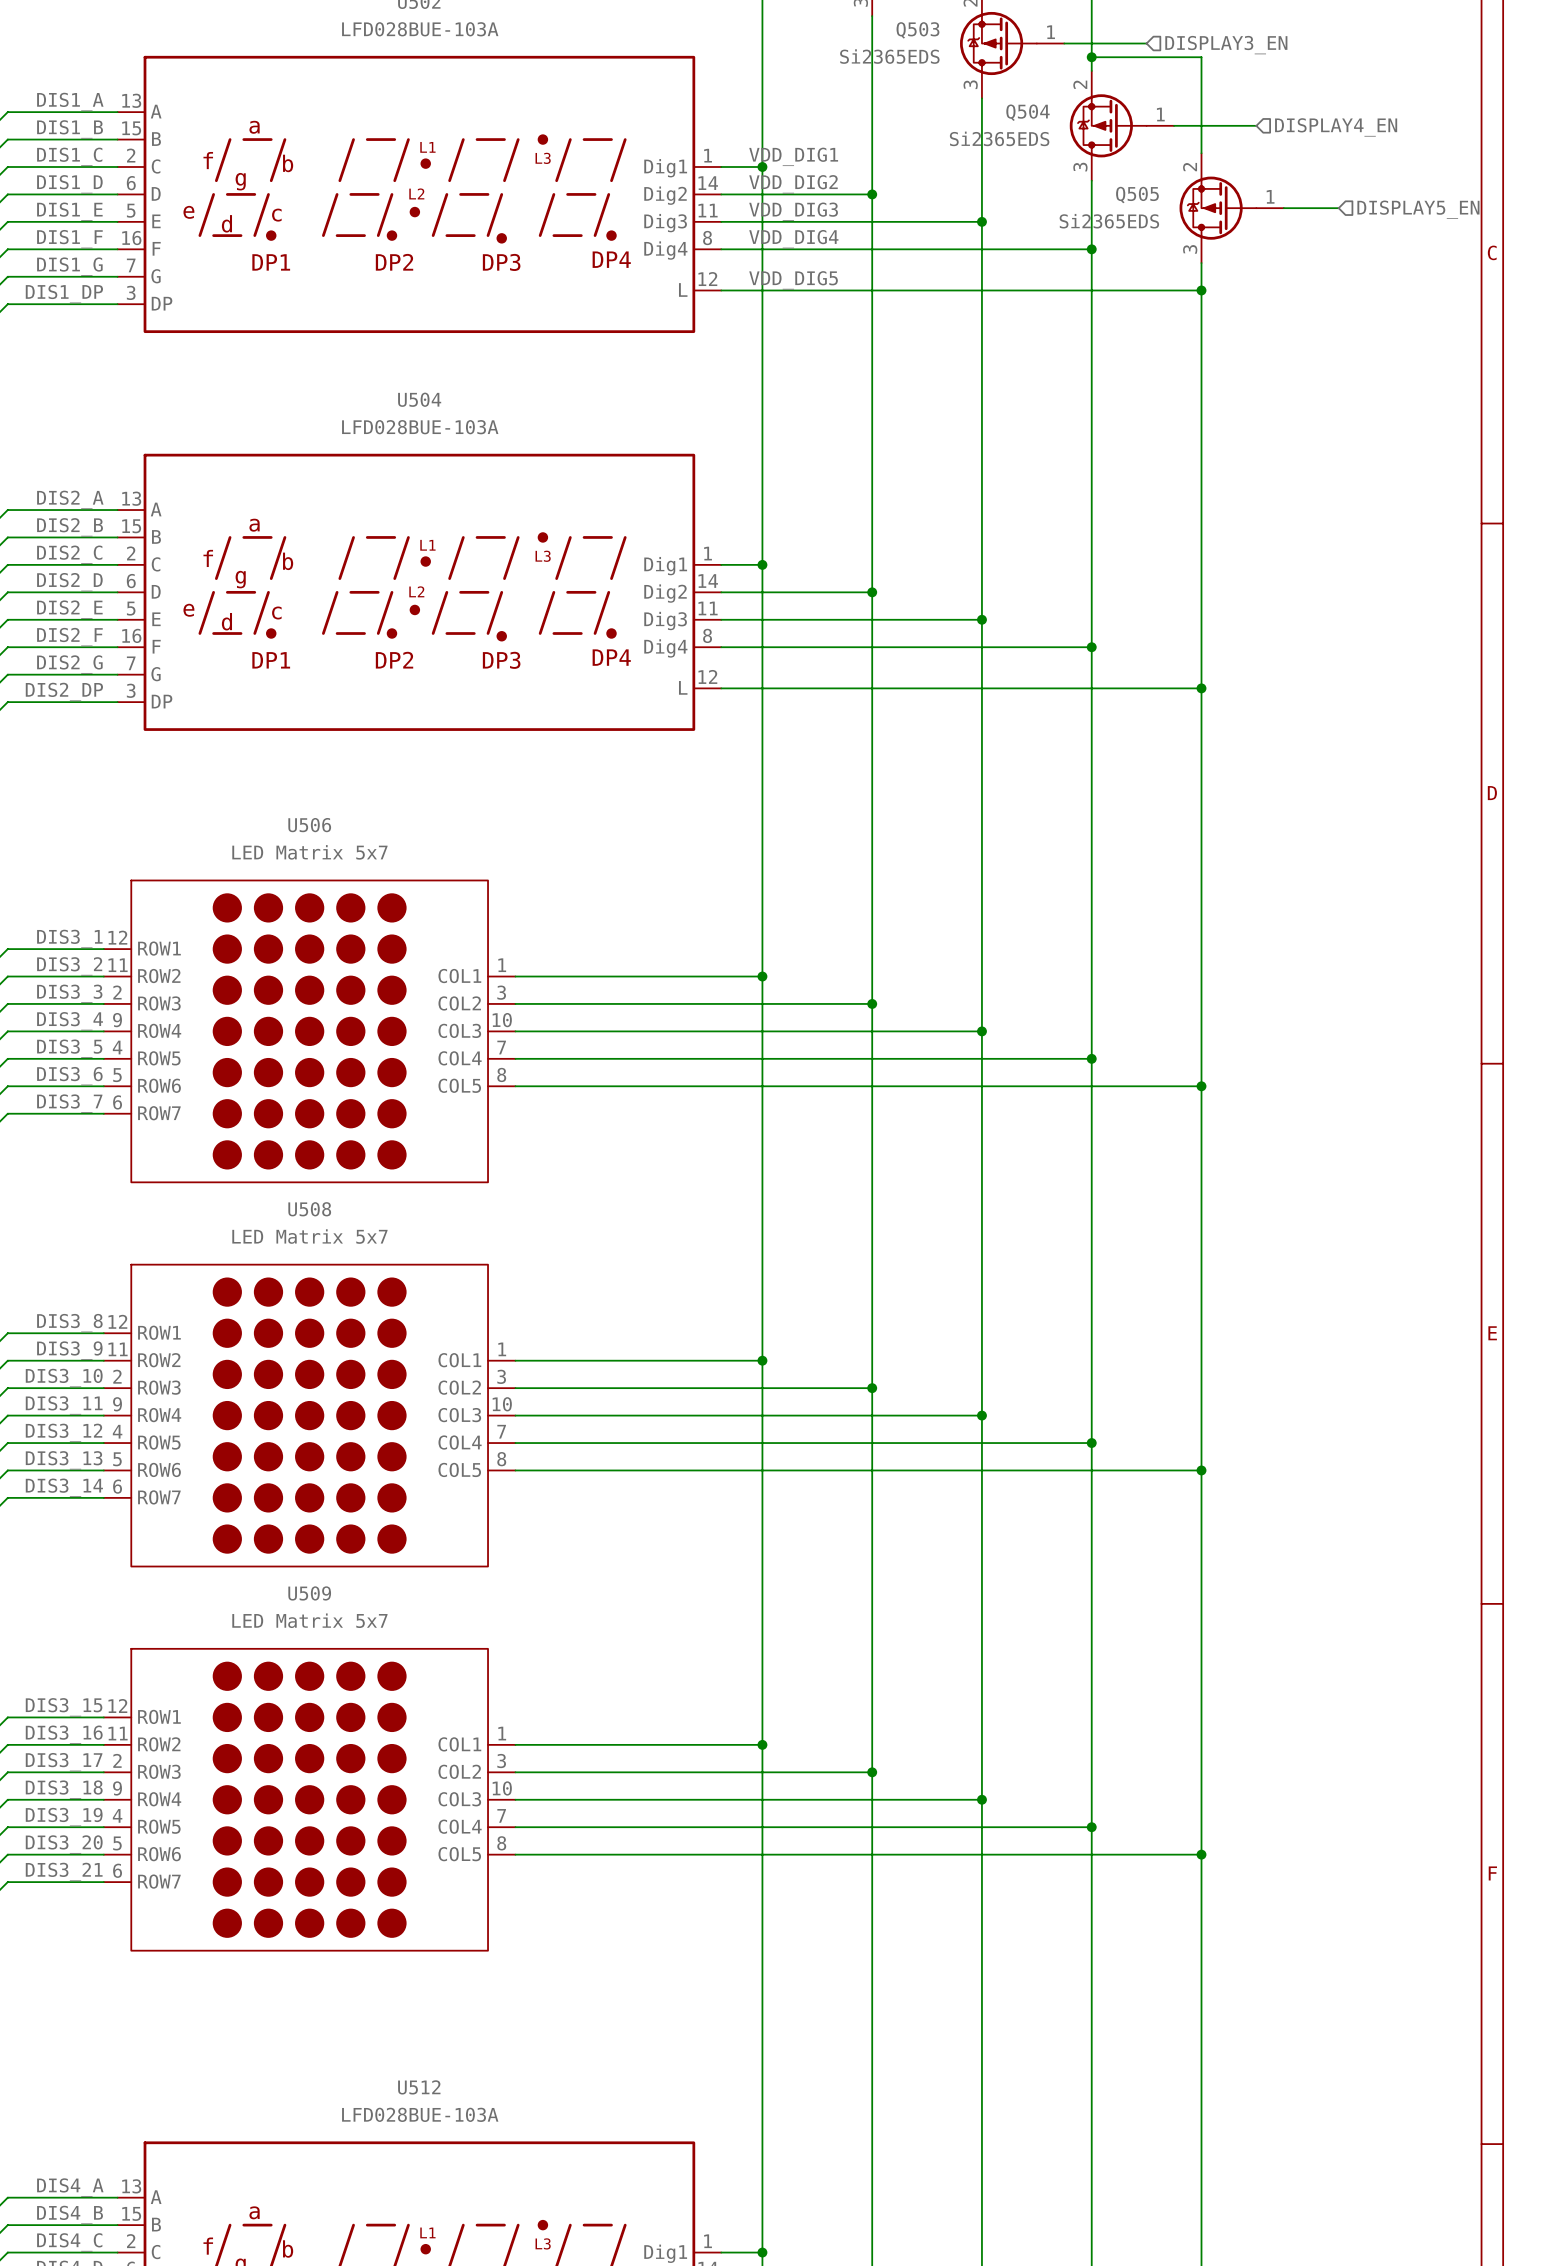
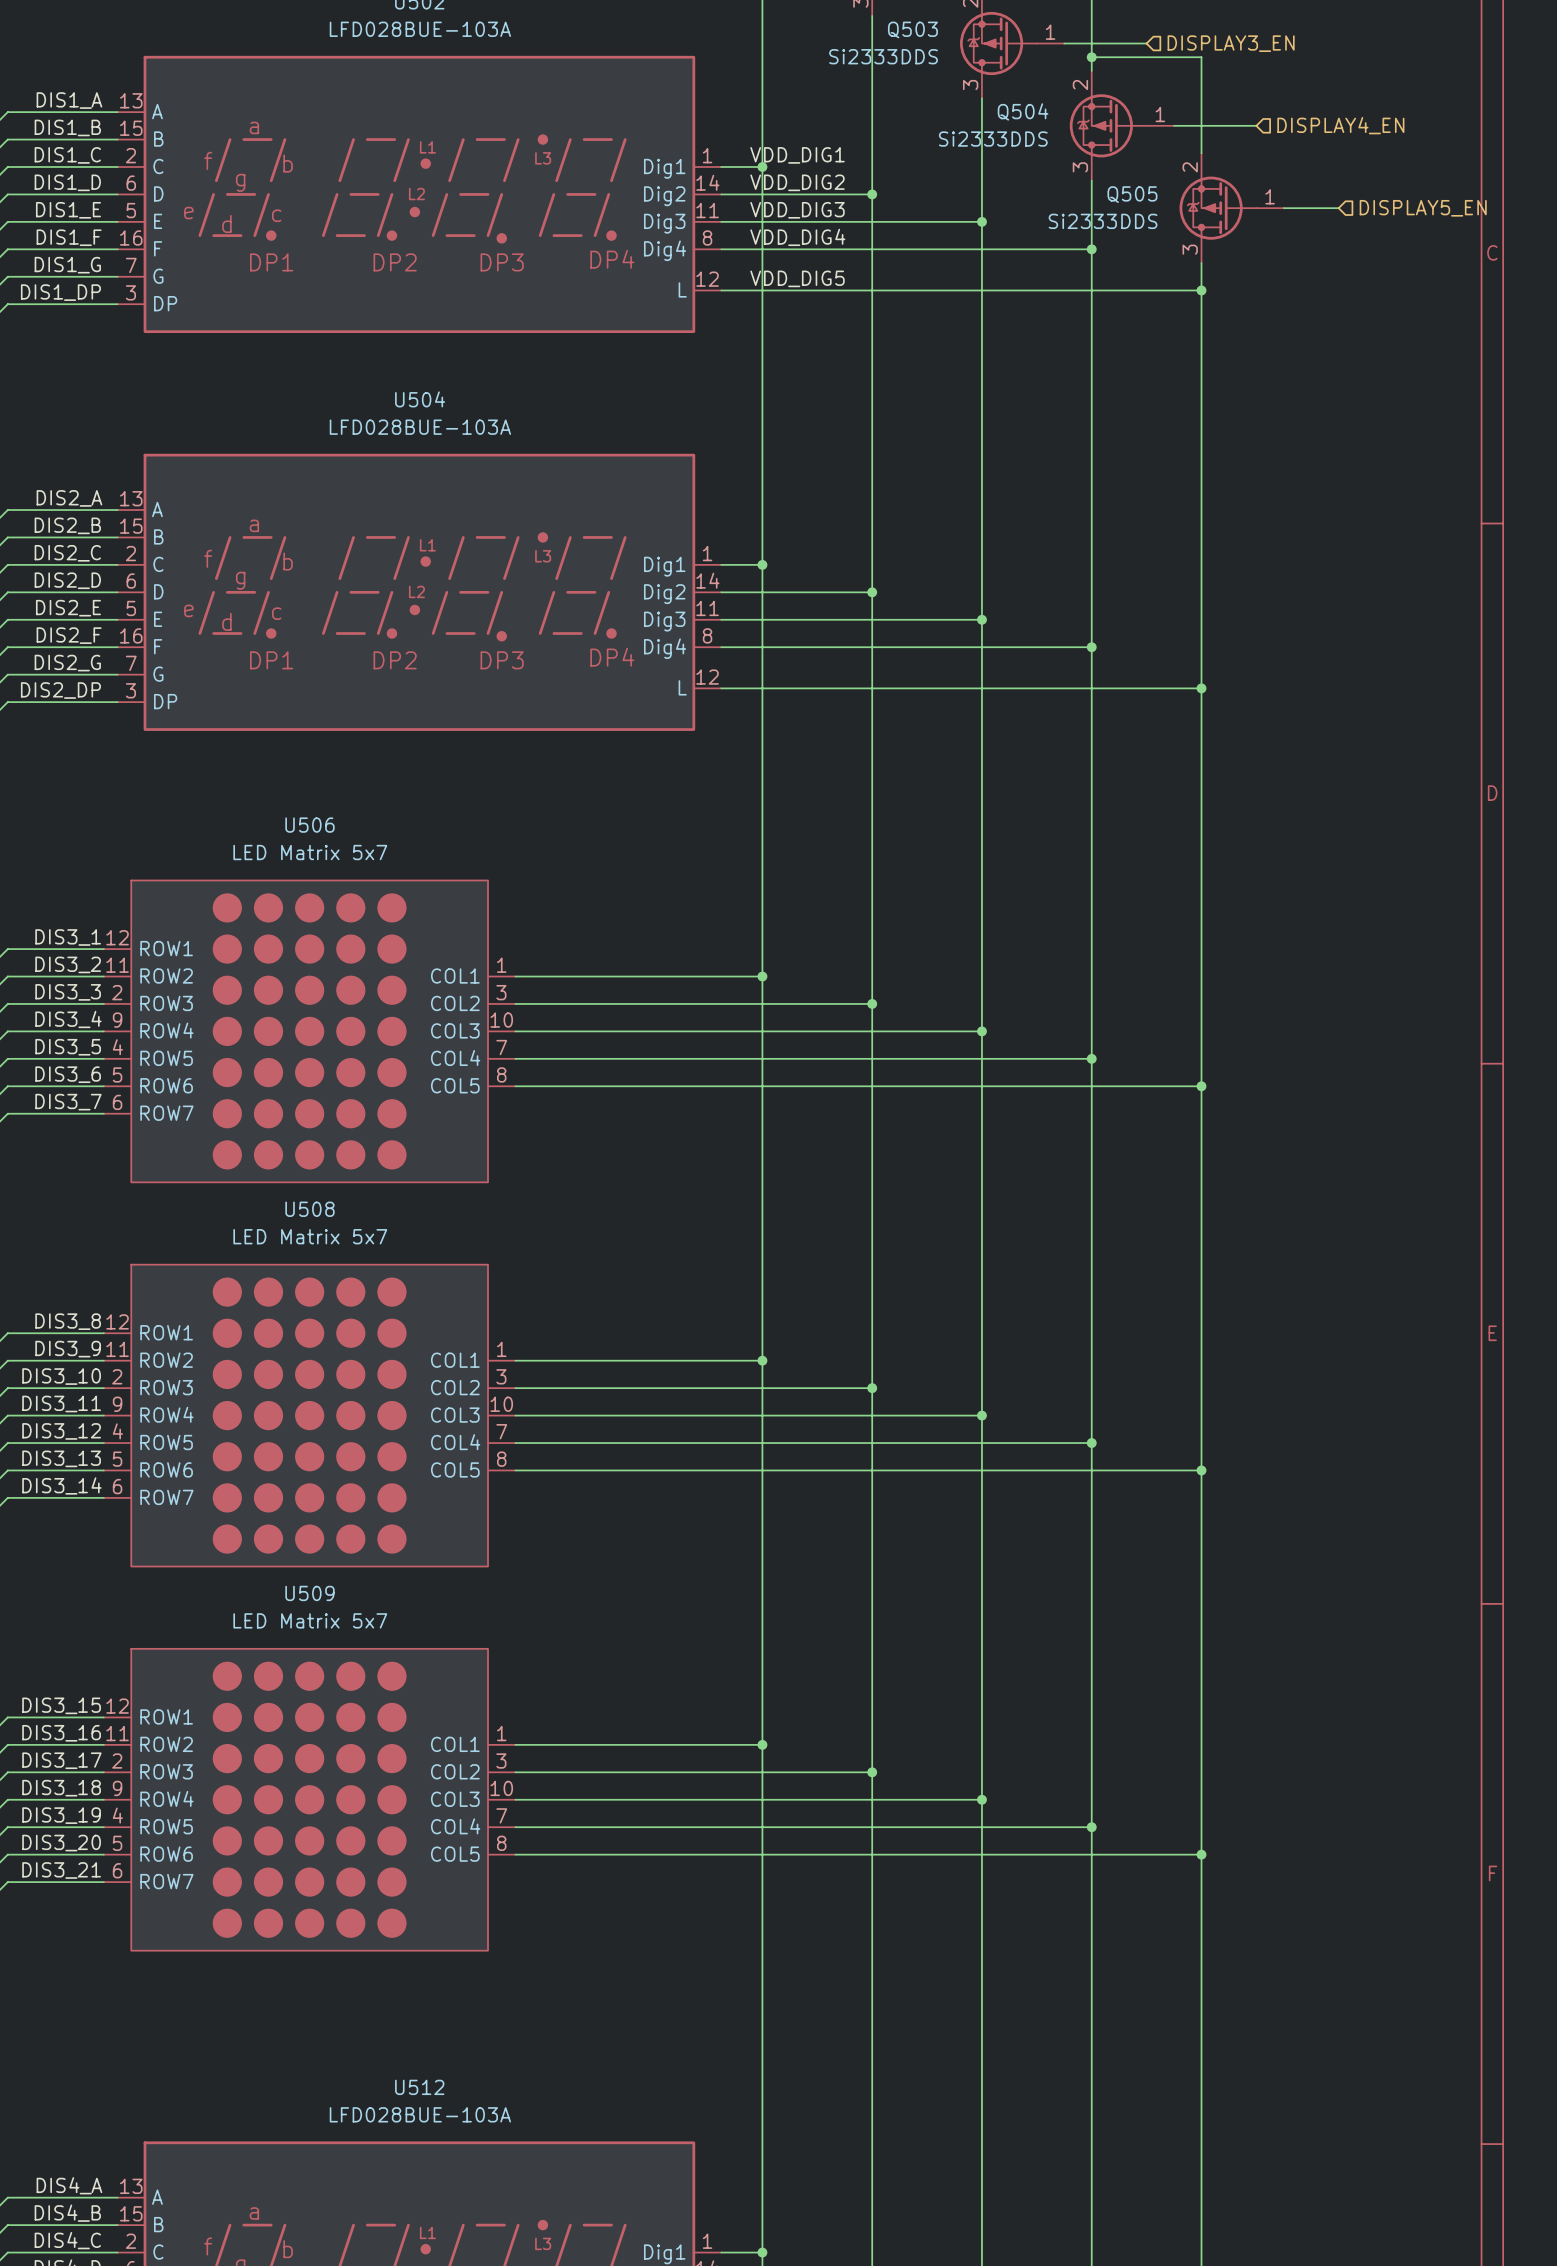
Q503 value: Si2365EDS (889, 56) -> Si2333DDS (883, 56)
Q504 value: Si2365EDS (999, 138) -> Si2333DDS (993, 139)
Q505 value: Si2365EDS (1109, 221) -> Si2333DDS (1103, 221)

